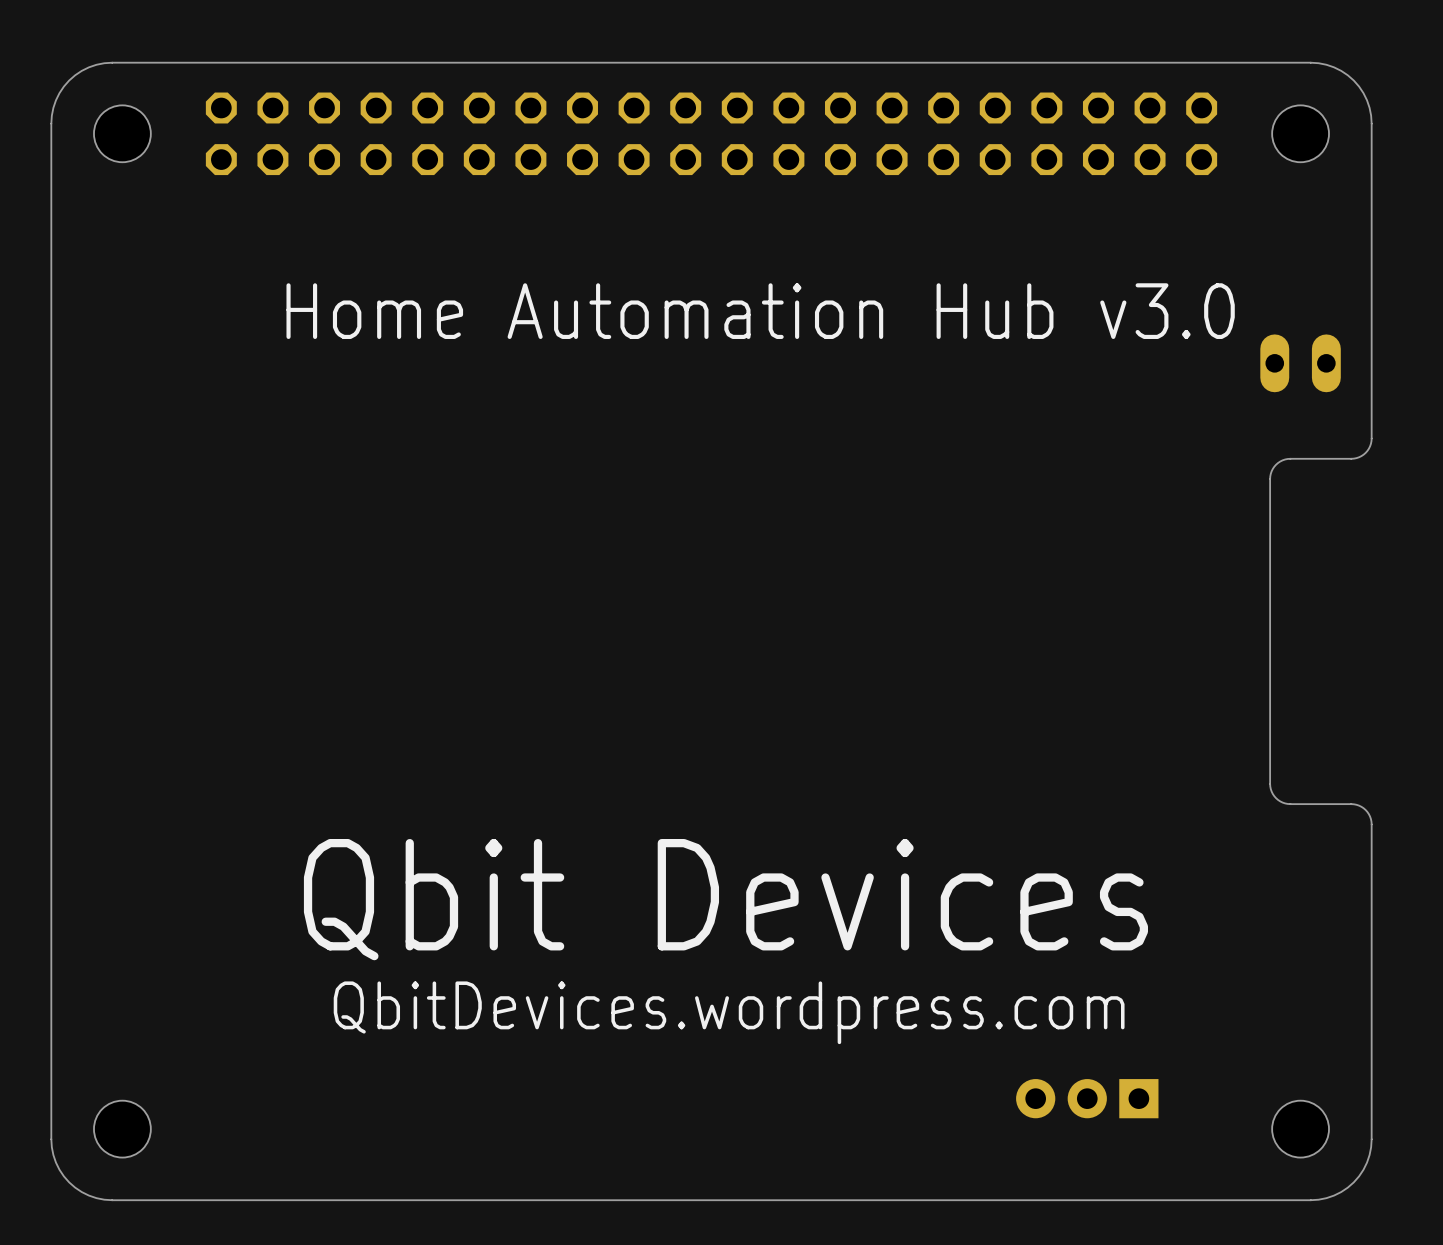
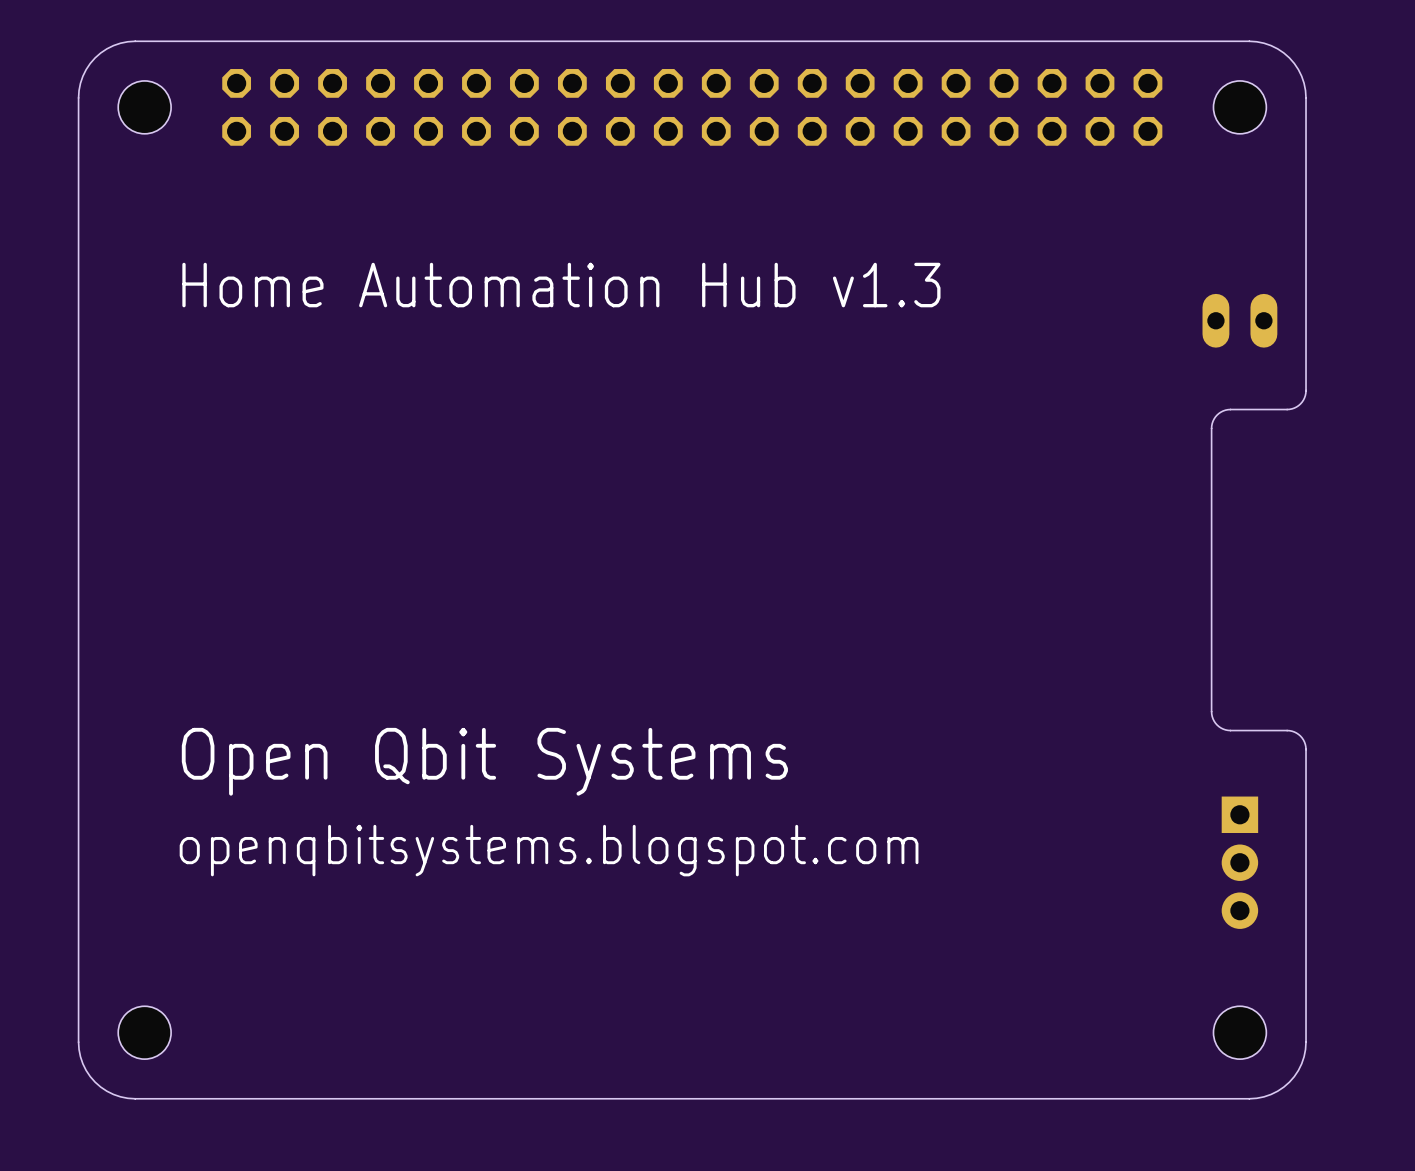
text: Home Automation Hub v3.0 (760, 311) -> Home Automation Hub v1.3 (561, 285)
text: none -> Open Qbit Systems (484, 761)
text: Qbit Devices (725, 899) -> none
text: none -> openqbitsystems.blogspot.com (549, 850)
text: QbitDevices.wordpress.com (729, 1012) -> none
part rotation: 0° (1087, 1098) -> 90° counterclockwise (1239, 862)
part position: (1087, 1098) -> (1239, 862)

